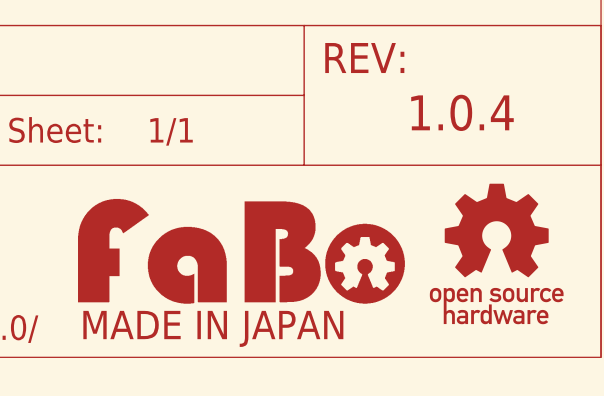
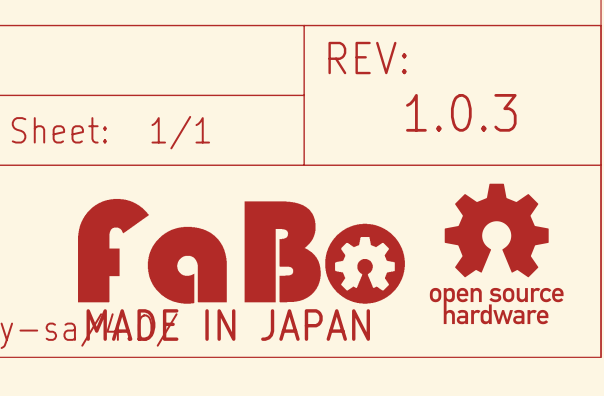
text: 1.0.4 (462, 112) -> 1.0.3 (461, 112)

